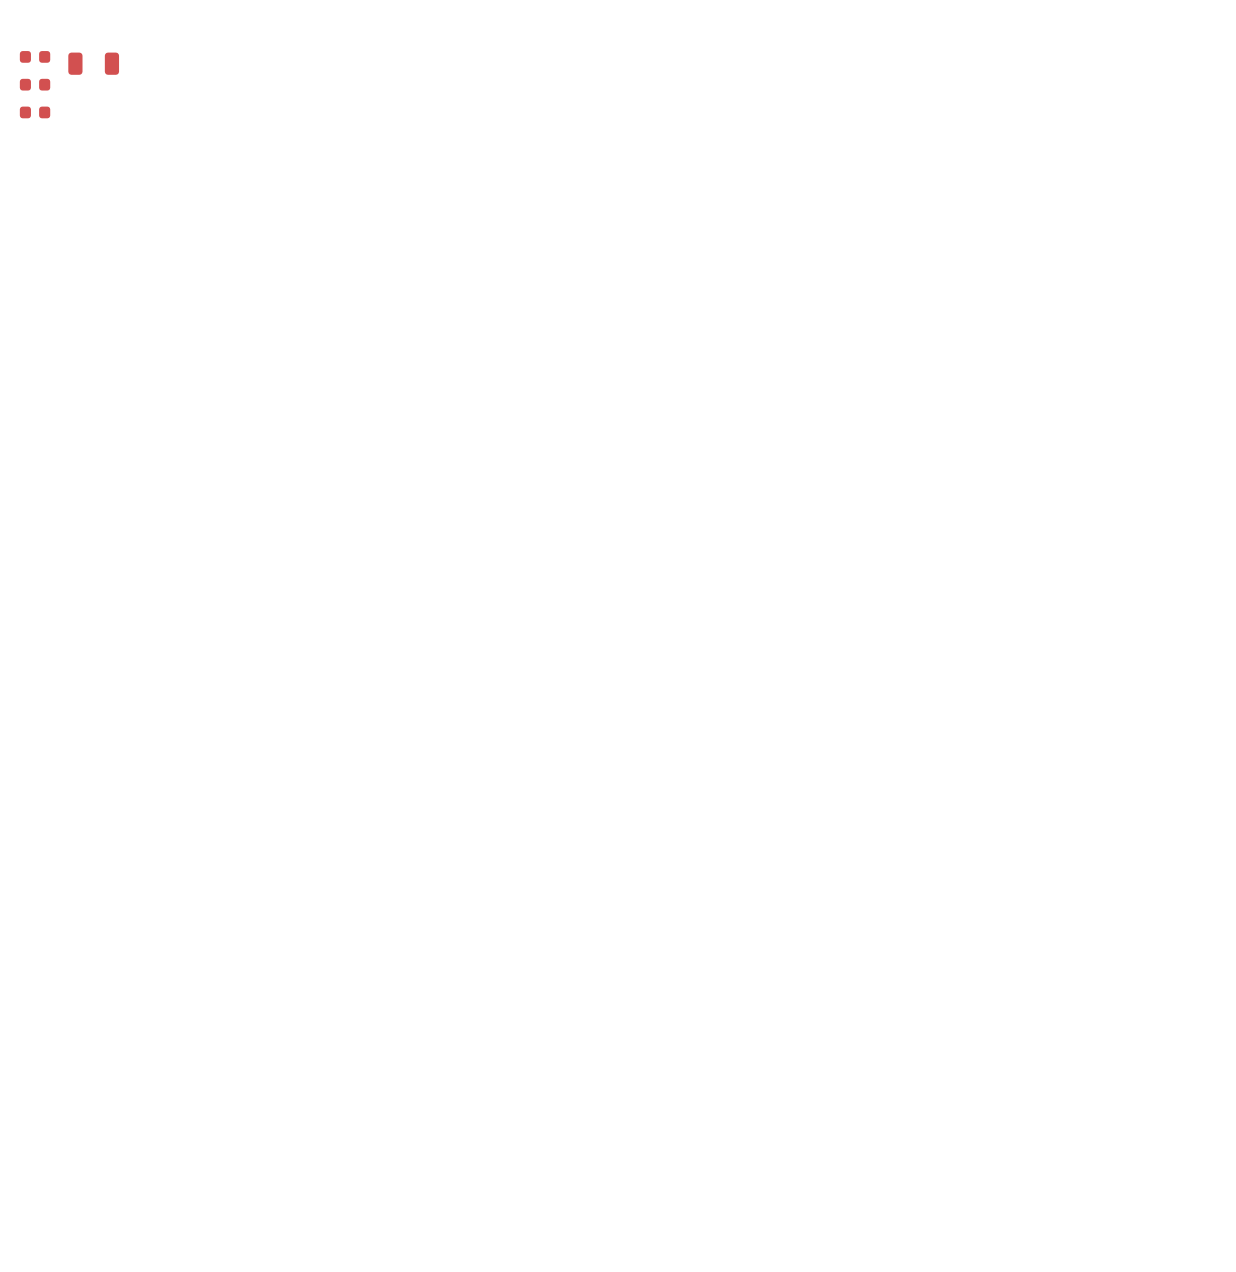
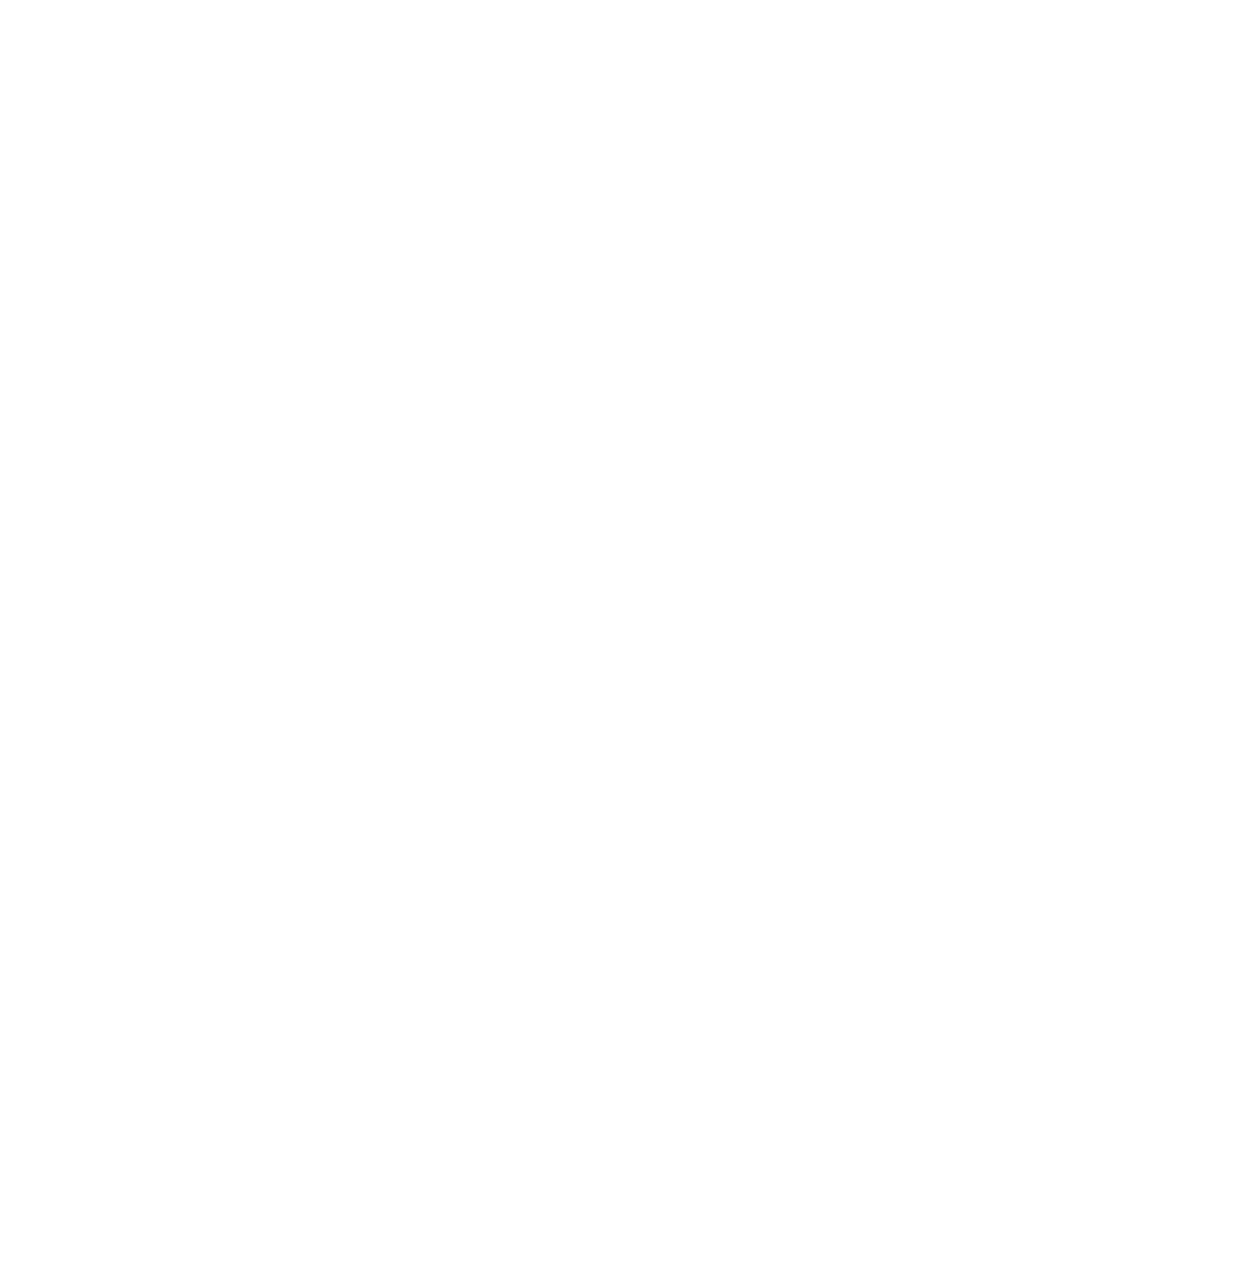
part: (35, 56) -> none
part: (93, 63) -> none
part: (35, 84) -> none
part: (35, 112) -> none

